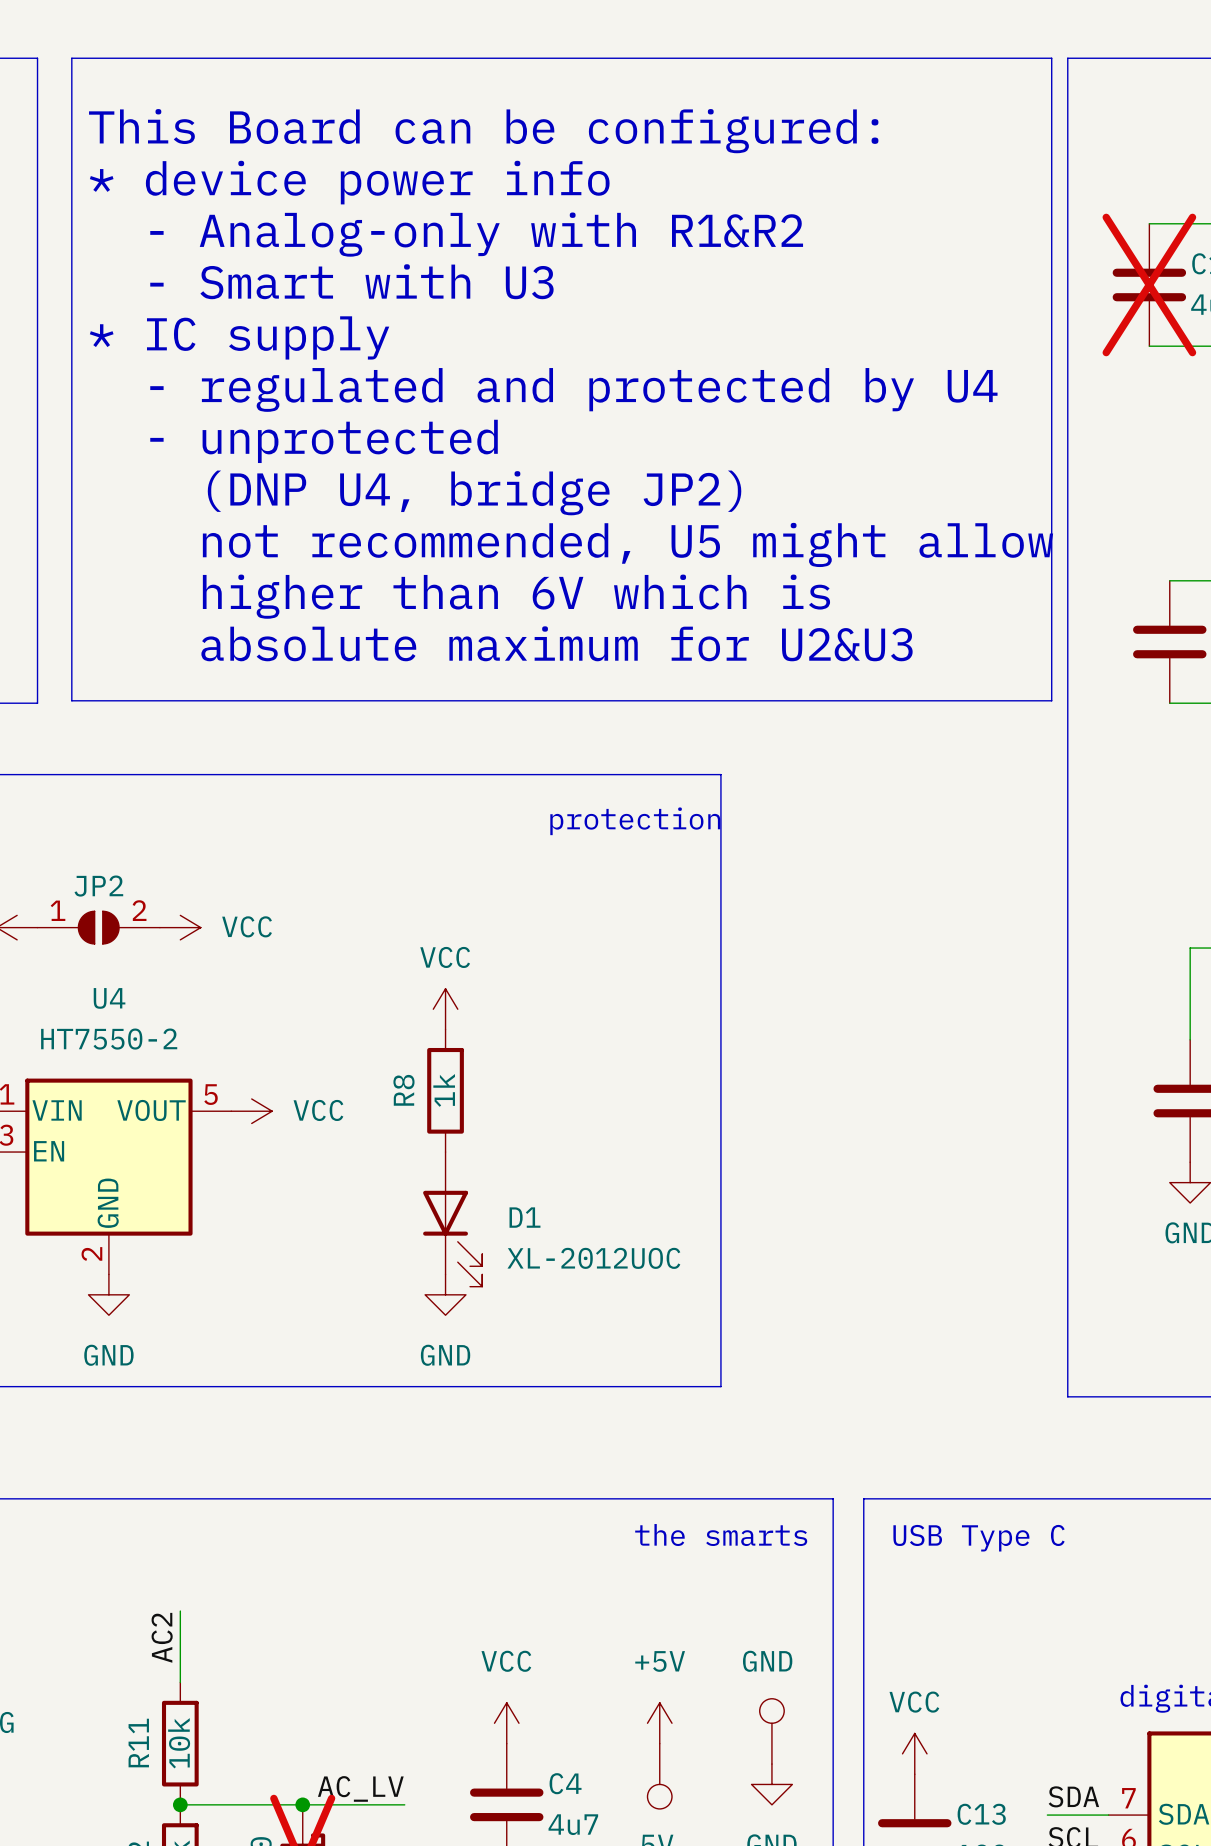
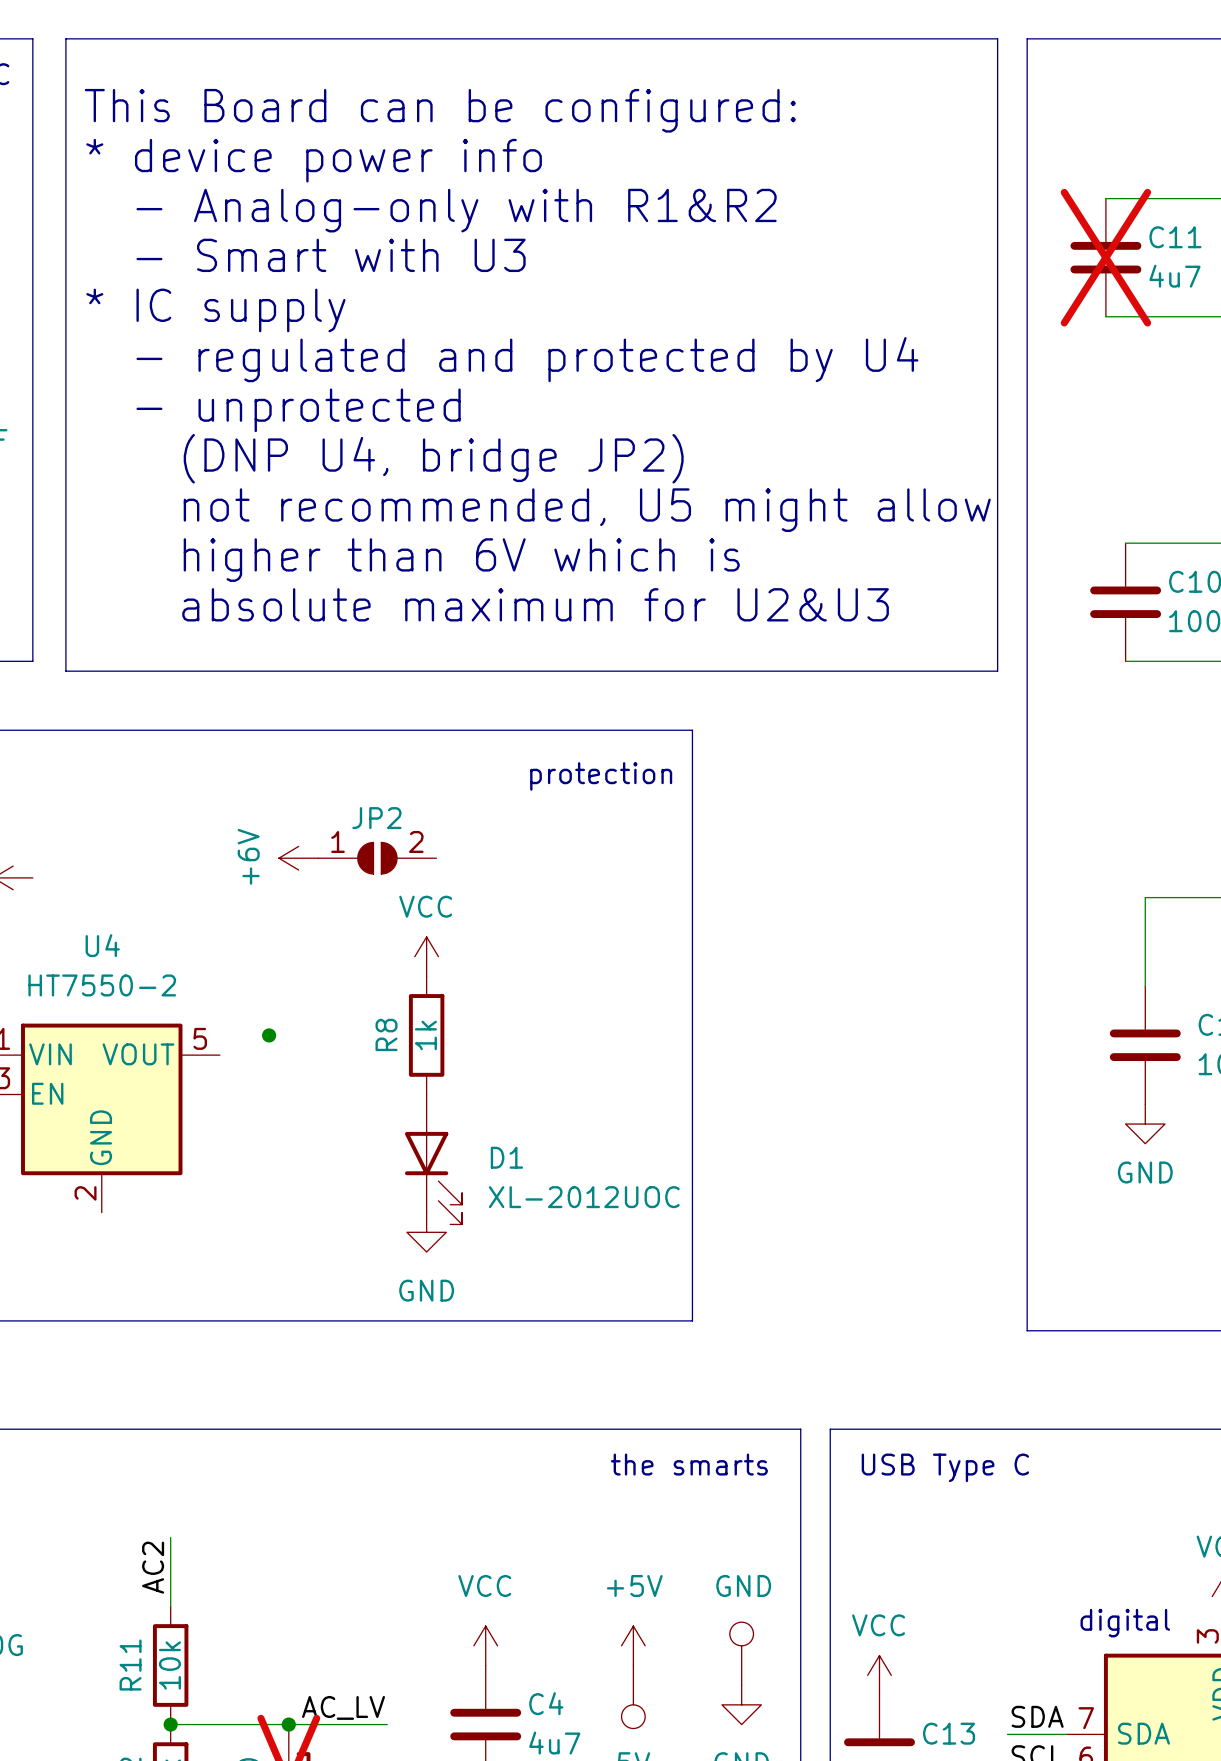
line: (1037, 58) (1051, 58) (1051, 700) (71, 700) -> (997, 38) (997, 671) (65, 671) (65, 659)
power symbol: none -> +6V (298, 858)
JP2 position: (98, 927) -> (377, 858)
power symbol: VCC (180, 927) -> none
junction: none -> (269, 1035)
power symbol: VCC (251, 1111) -> none
power symbol: GND (108, 1294) -> none

